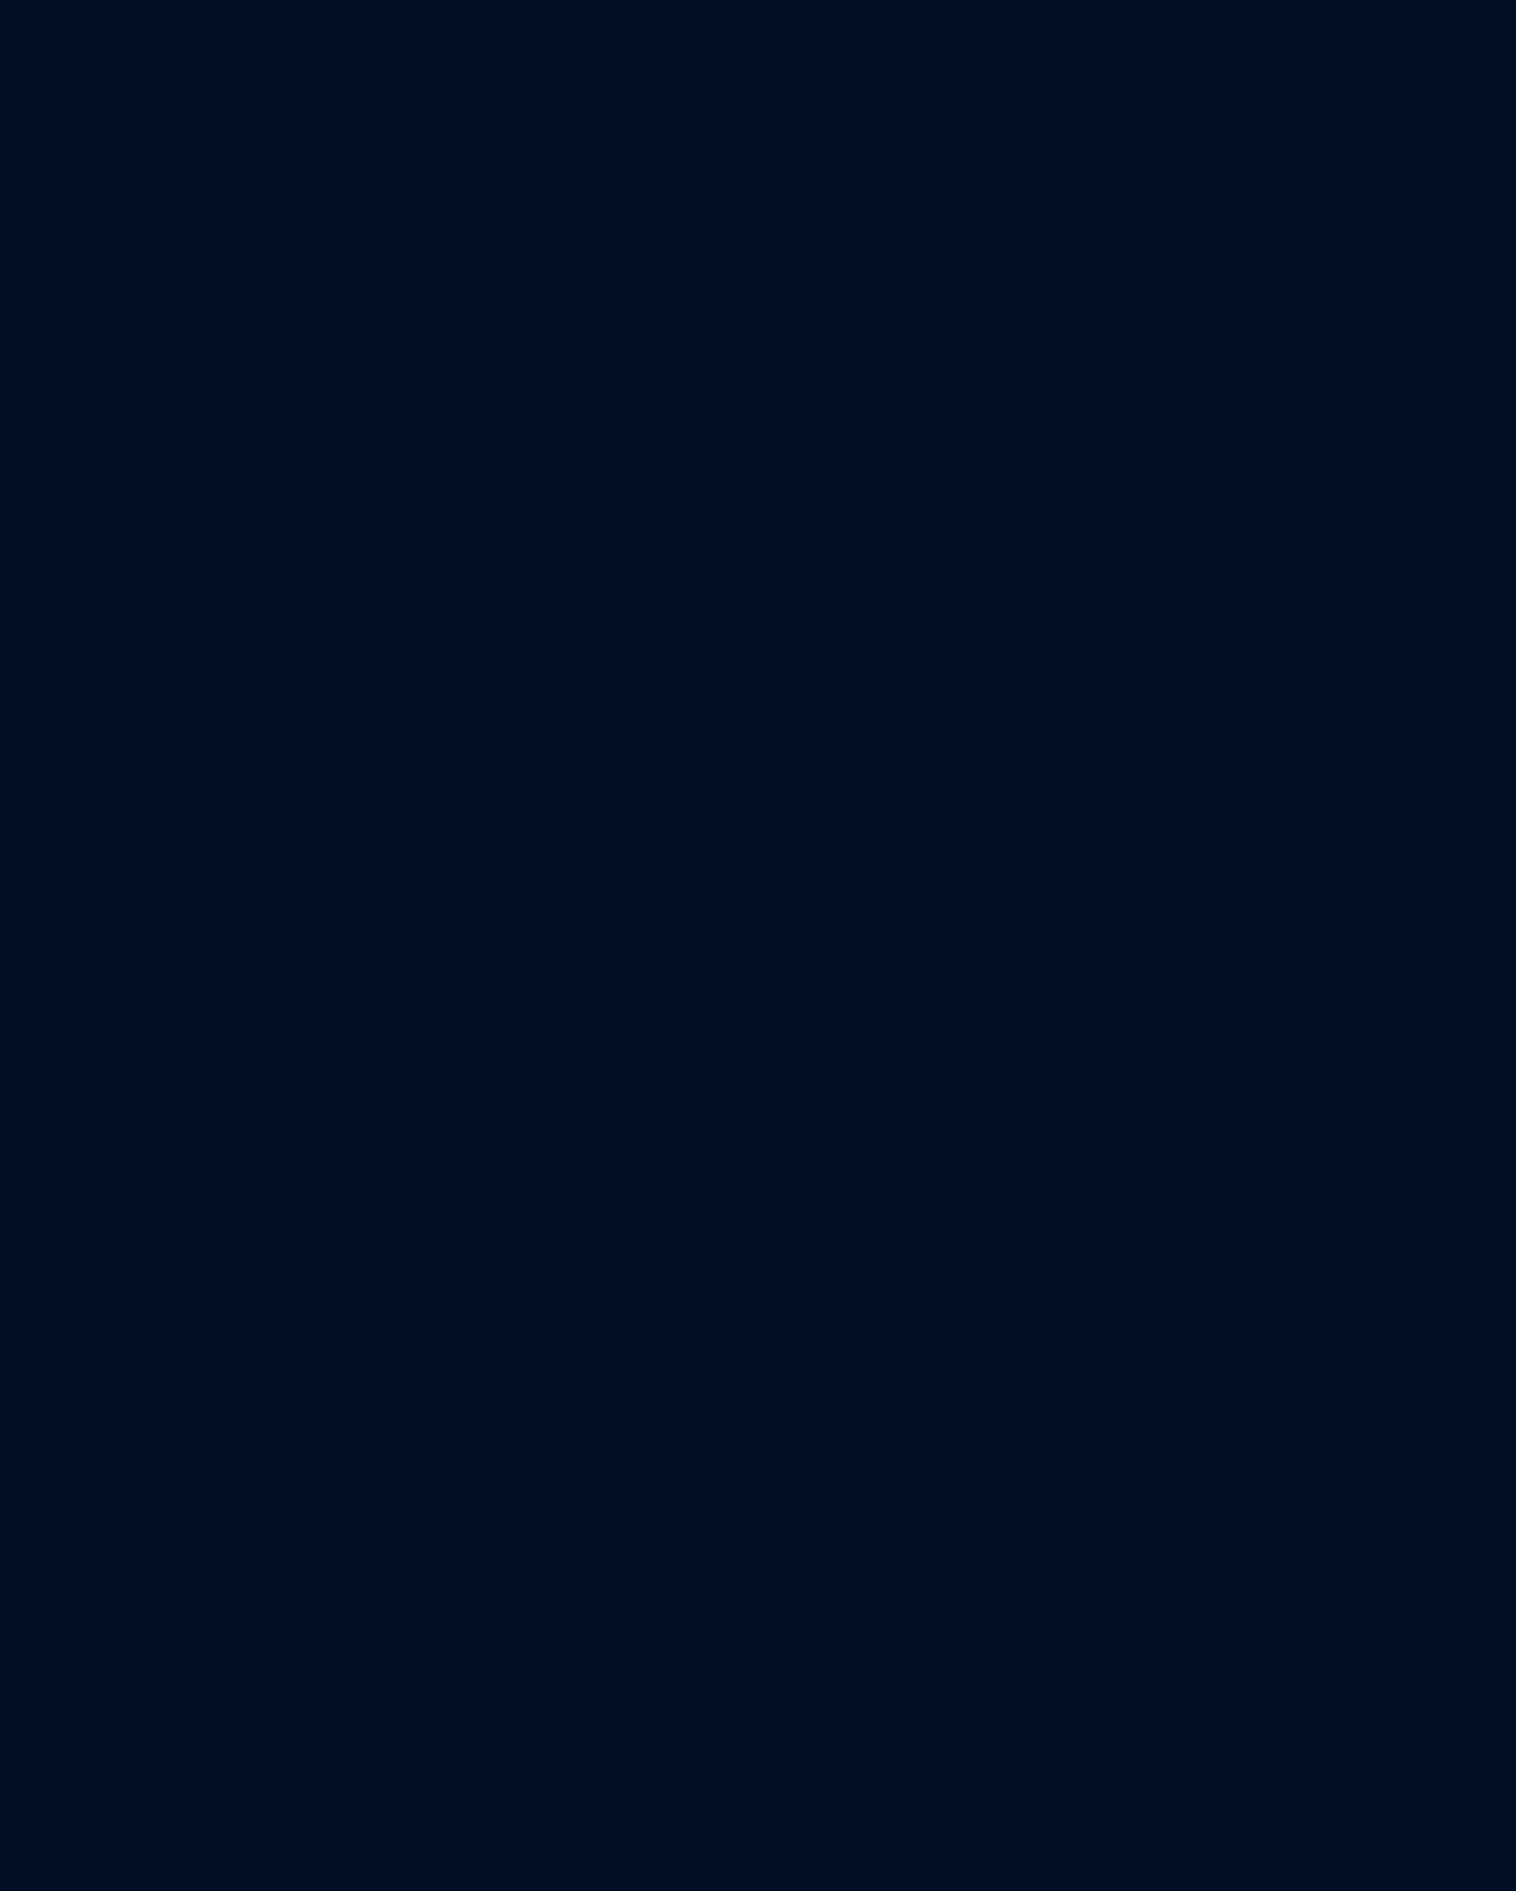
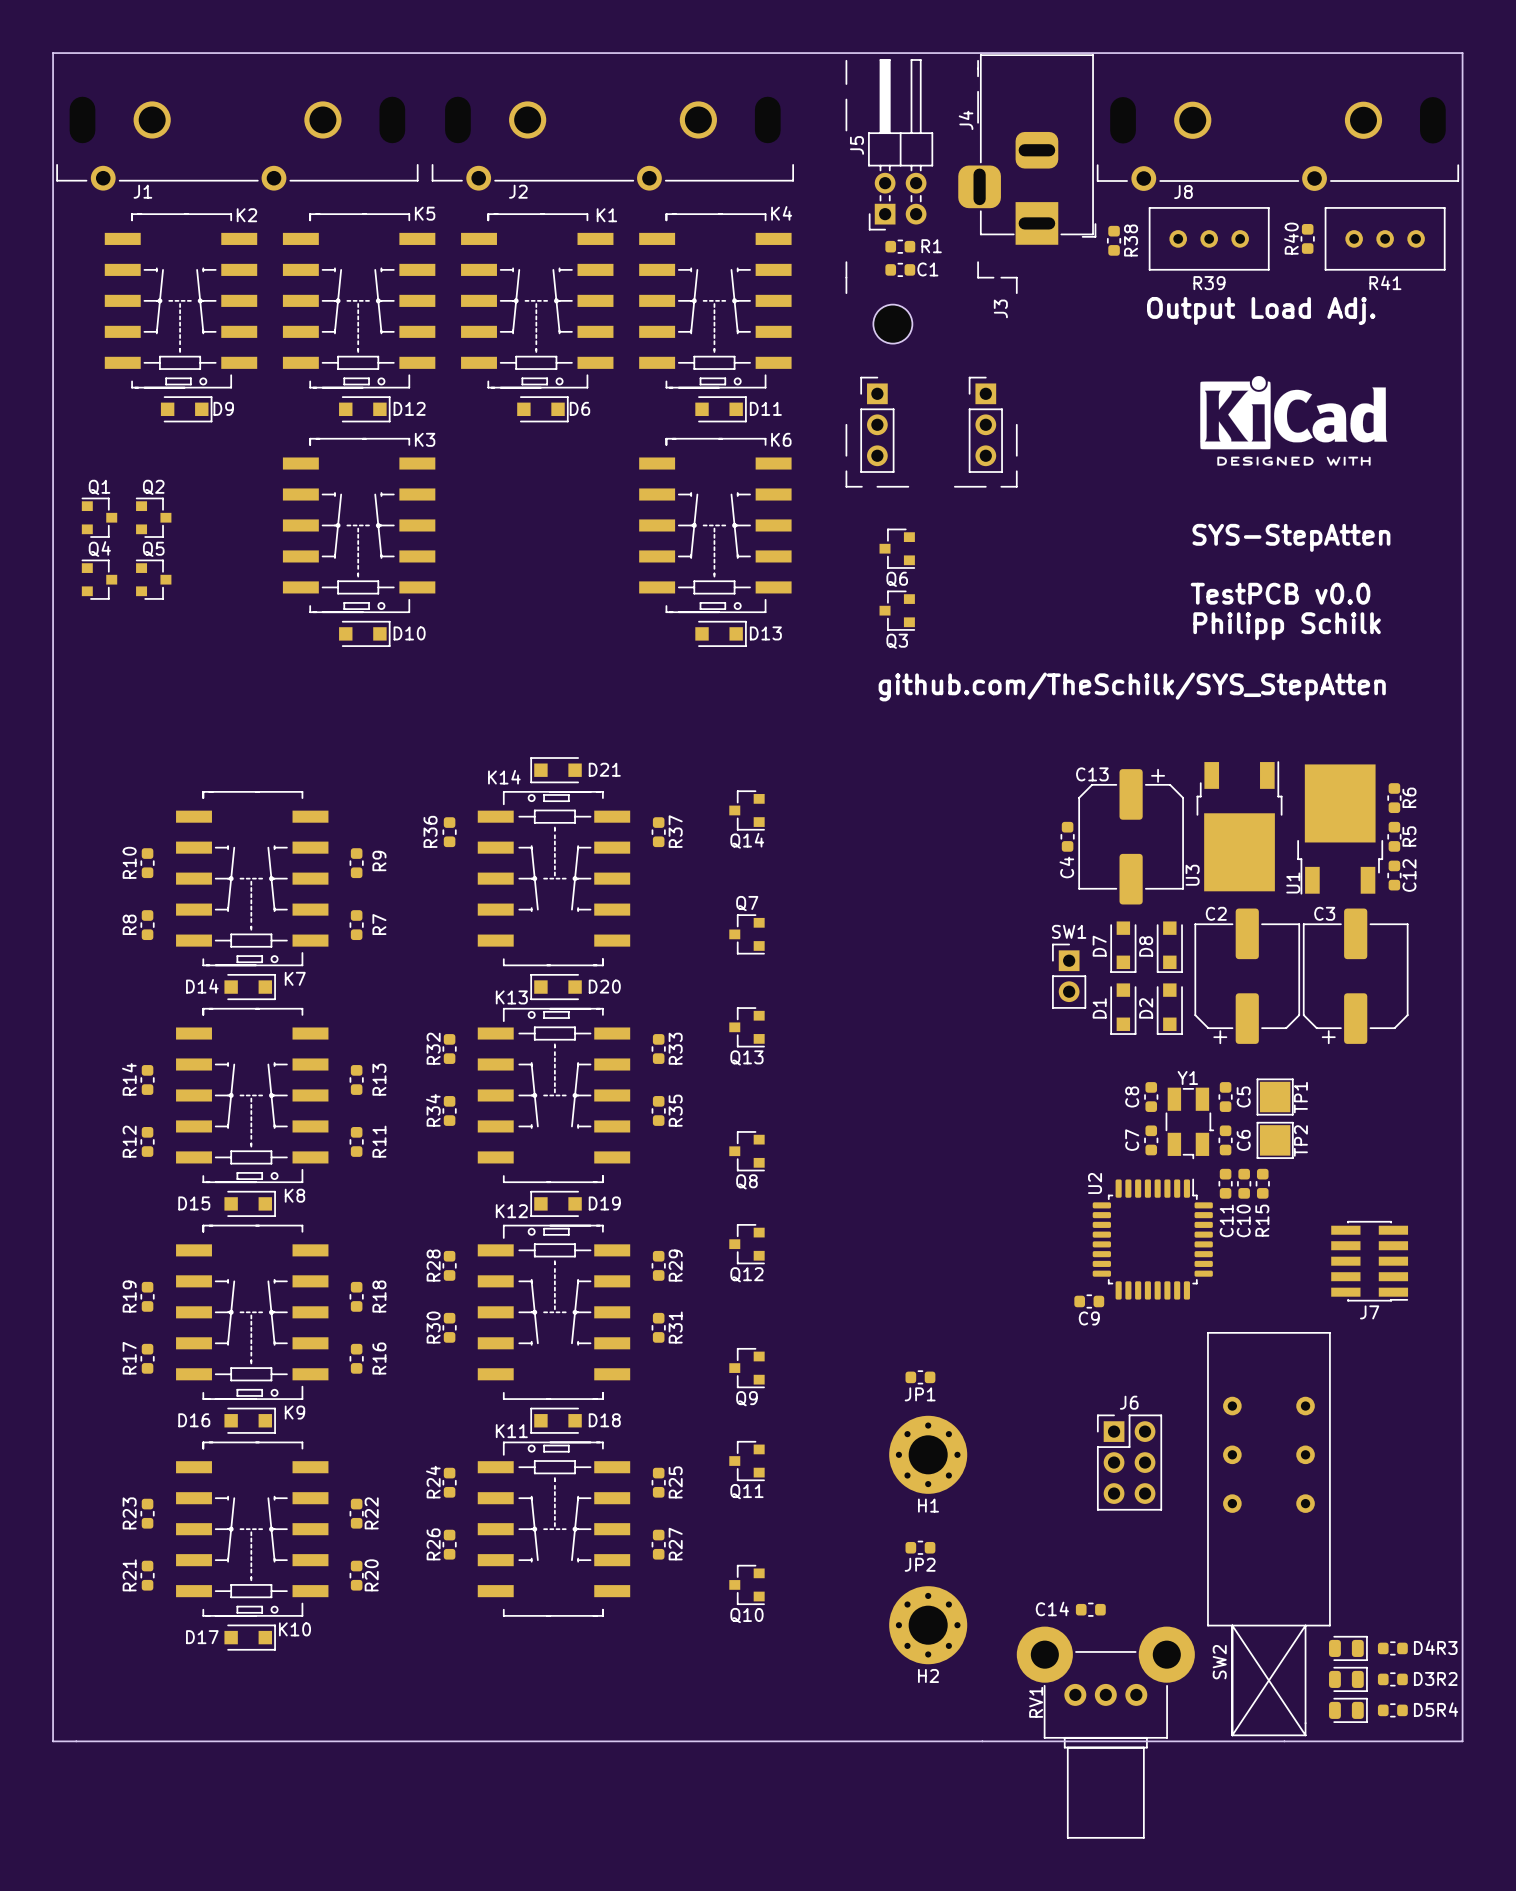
board edge: none -> (53, 53) (53, 1741) (1462, 1741) (1462, 53) (53, 53)
J1: none -> (237, 143)
J2: none -> (612, 143)
J8: none -> (1277, 143)
J5: none -> (900, 144)
J4: none -> (1027, 149)
R39: none -> (1209, 238)
R40: none -> (1307, 238)
R41: none -> (1385, 238)
R38: none -> (1114, 240)
R1: none -> (900, 246)
C1: none -> (900, 269)
J3: none -> (931, 273)
K2: none -> (180, 300)
K5: none -> (359, 300)
K1: none -> (537, 300)
K4: none -> (715, 300)
text: none -> Output Load Adj. (1261, 310)
drawing: none -> [1200, 376, 1388, 466]
D9: none -> (186, 409)
D12: none -> (364, 409)
D6: none -> (542, 409)
D11: none -> (720, 409)
Q1: none -> (99, 517)
Q2: none -> (153, 517)
K3: none -> (359, 525)
K6: none -> (715, 525)
text: none -> SYS-StepAtten (1291, 537)
Q6: none -> (897, 548)
Q4: none -> (99, 579)
Q5: none -> (153, 579)
text: none -> TestPCB v0.0 (1280, 593)
Q3: none -> (897, 610)
text: none -> Philipp Schilk (1287, 626)
D10: none -> (364, 633)
D13: none -> (720, 633)
text: none -> github.com/TheSchilk/SYS_StepAtten (1132, 686)
D21: none -> (556, 770)
R6: none -> (1394, 798)
Q14: none -> (747, 810)
U3: none -> (1239, 826)
U1: none -> (1340, 829)
R36: none -> (449, 832)
R37: none -> (658, 832)
C4: none -> (1067, 836)
C13: none -> (1131, 836)
R5: none -> (1394, 836)
R10: none -> (147, 863)
R9: none -> (356, 863)
C12: none -> (1394, 875)
K7: none -> (252, 878)
K14: none -> (553, 878)
R8: none -> (147, 925)
R7: none -> (356, 925)
Q7: none -> (747, 934)
D7: none -> (1123, 947)
D8: none -> (1169, 947)
SW1: none -> (1069, 976)
C2: none -> (1247, 976)
C3: none -> (1355, 976)
D14: none -> (250, 987)
D20: none -> (556, 987)
D1: none -> (1123, 1009)
D2: none -> (1169, 1009)
Q13: none -> (747, 1027)
R32: none -> (449, 1049)
R33: none -> (658, 1049)
R14: none -> (147, 1079)
R13: none -> (356, 1079)
K8: none -> (252, 1095)
K13: none -> (553, 1095)
C8: none -> (1151, 1097)
C5: none -> (1225, 1097)
TP1: none -> (1275, 1097)
R34: none -> (449, 1110)
R35: none -> (658, 1110)
Y1: none -> (1189, 1123)
C7: none -> (1151, 1140)
C6: none -> (1225, 1140)
TP2: none -> (1275, 1140)
R12: none -> (147, 1141)
R11: none -> (356, 1141)
Q8: none -> (747, 1151)
C11: none -> (1225, 1183)
C10: none -> (1244, 1183)
R15: none -> (1262, 1183)
D15: none -> (250, 1203)
D19: none -> (556, 1203)
U2: none -> (1152, 1239)
Q12: none -> (747, 1244)
J7: none -> (1369, 1261)
R28: none -> (449, 1265)
R29: none -> (658, 1265)
R19: none -> (147, 1296)
R18: none -> (356, 1296)
C9: none -> (1089, 1301)
K9: none -> (252, 1312)
K12: none -> (553, 1312)
R30: none -> (449, 1327)
R31: none -> (658, 1327)
R17: none -> (147, 1358)
R16: none -> (356, 1358)
Q9: none -> (747, 1368)
JP1: none -> (920, 1377)
D16: none -> (250, 1420)
D18: none -> (556, 1420)
H1: none -> (928, 1454)
Q11: none -> (747, 1461)
J6: none -> (1129, 1462)
R24: none -> (449, 1482)
R25: none -> (658, 1482)
R23: none -> (147, 1513)
R22: none -> (356, 1513)
K10: none -> (252, 1529)
K11: none -> (553, 1529)
SW2: none -> (1268, 1534)
R26: none -> (449, 1544)
R27: none -> (658, 1544)
JP2: none -> (920, 1547)
R21: none -> (147, 1575)
R20: none -> (356, 1575)
Q10: none -> (747, 1584)
C14: none -> (1090, 1609)
H2: none -> (928, 1625)
D17: none -> (250, 1637)
D4: none -> (1348, 1648)
R3: none -> (1392, 1648)
D3: none -> (1348, 1679)
R2: none -> (1392, 1679)
D5: none -> (1348, 1710)
R4: none -> (1392, 1710)
RV1: none -> (1105, 1732)

